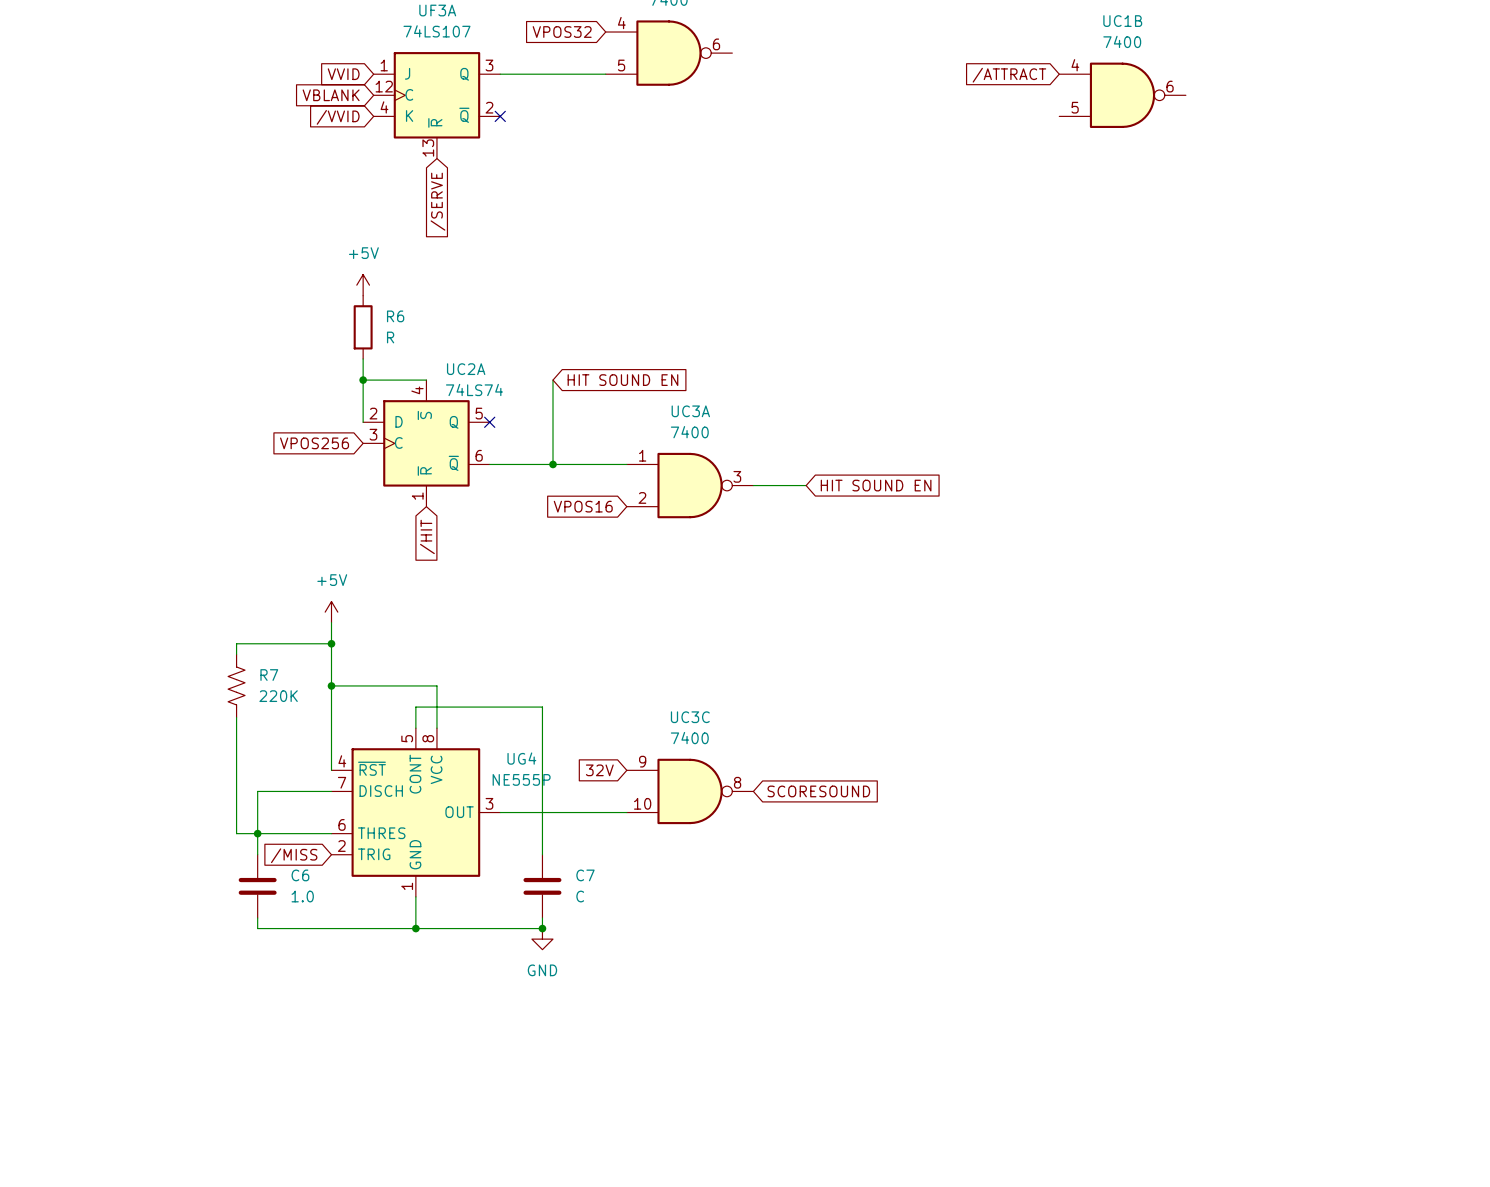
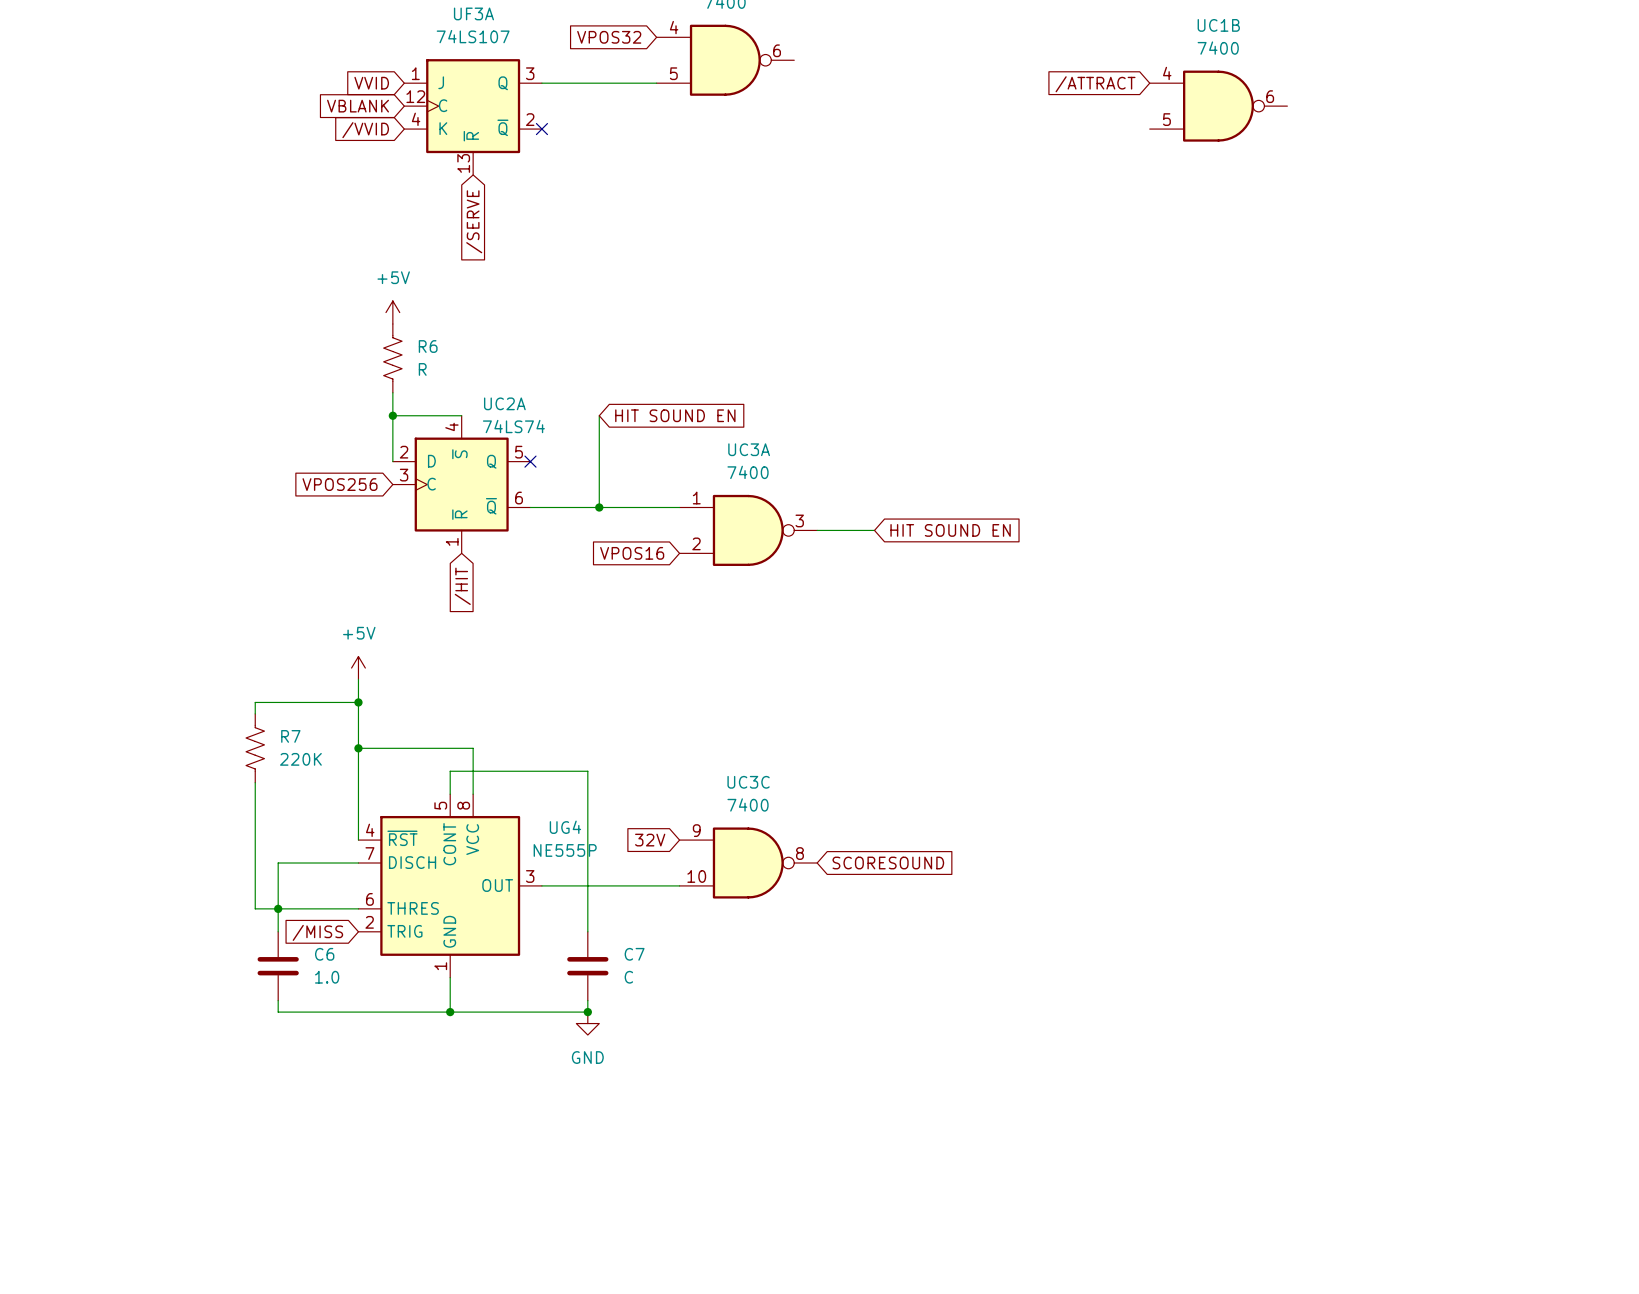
R6 symbol: [353, 295, 373, 359] -> [383, 324, 403, 393]

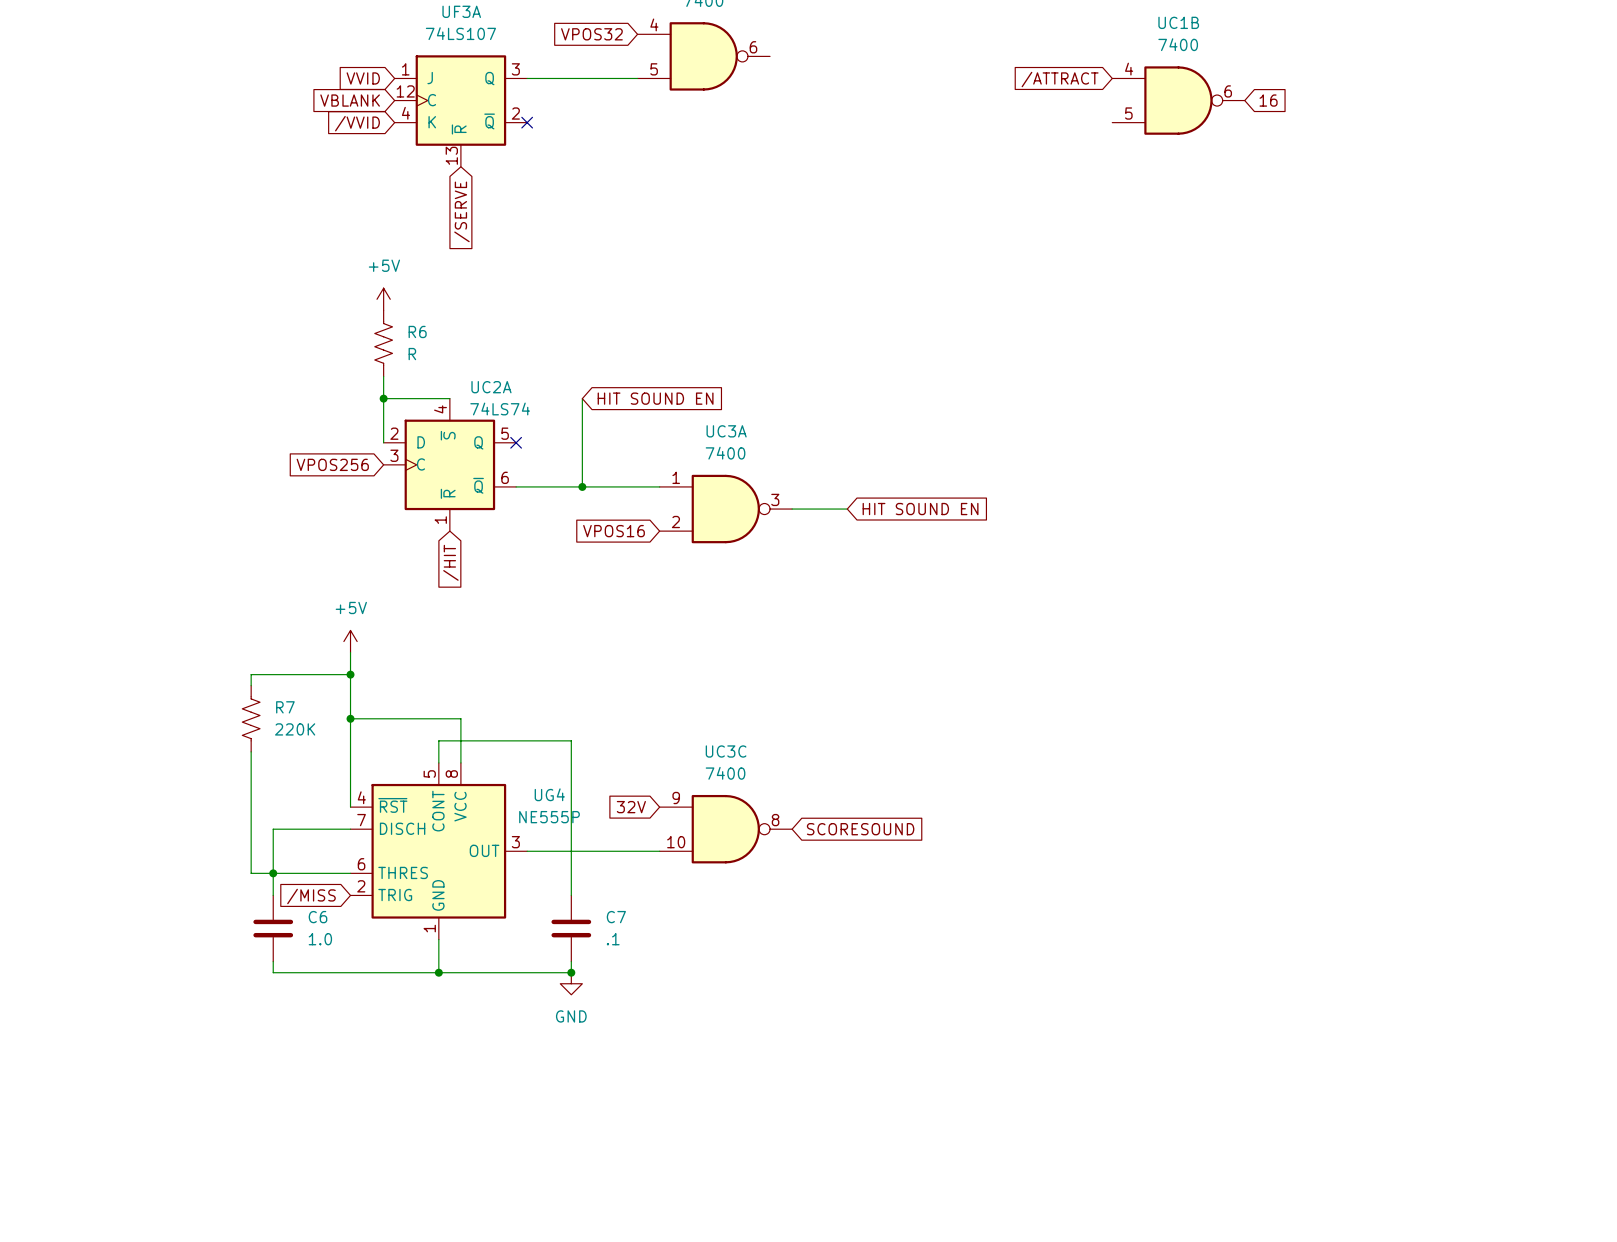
global label: none -> 16 (1268, 100)
C7 value: C (628, 977) -> .1 (613, 939)

